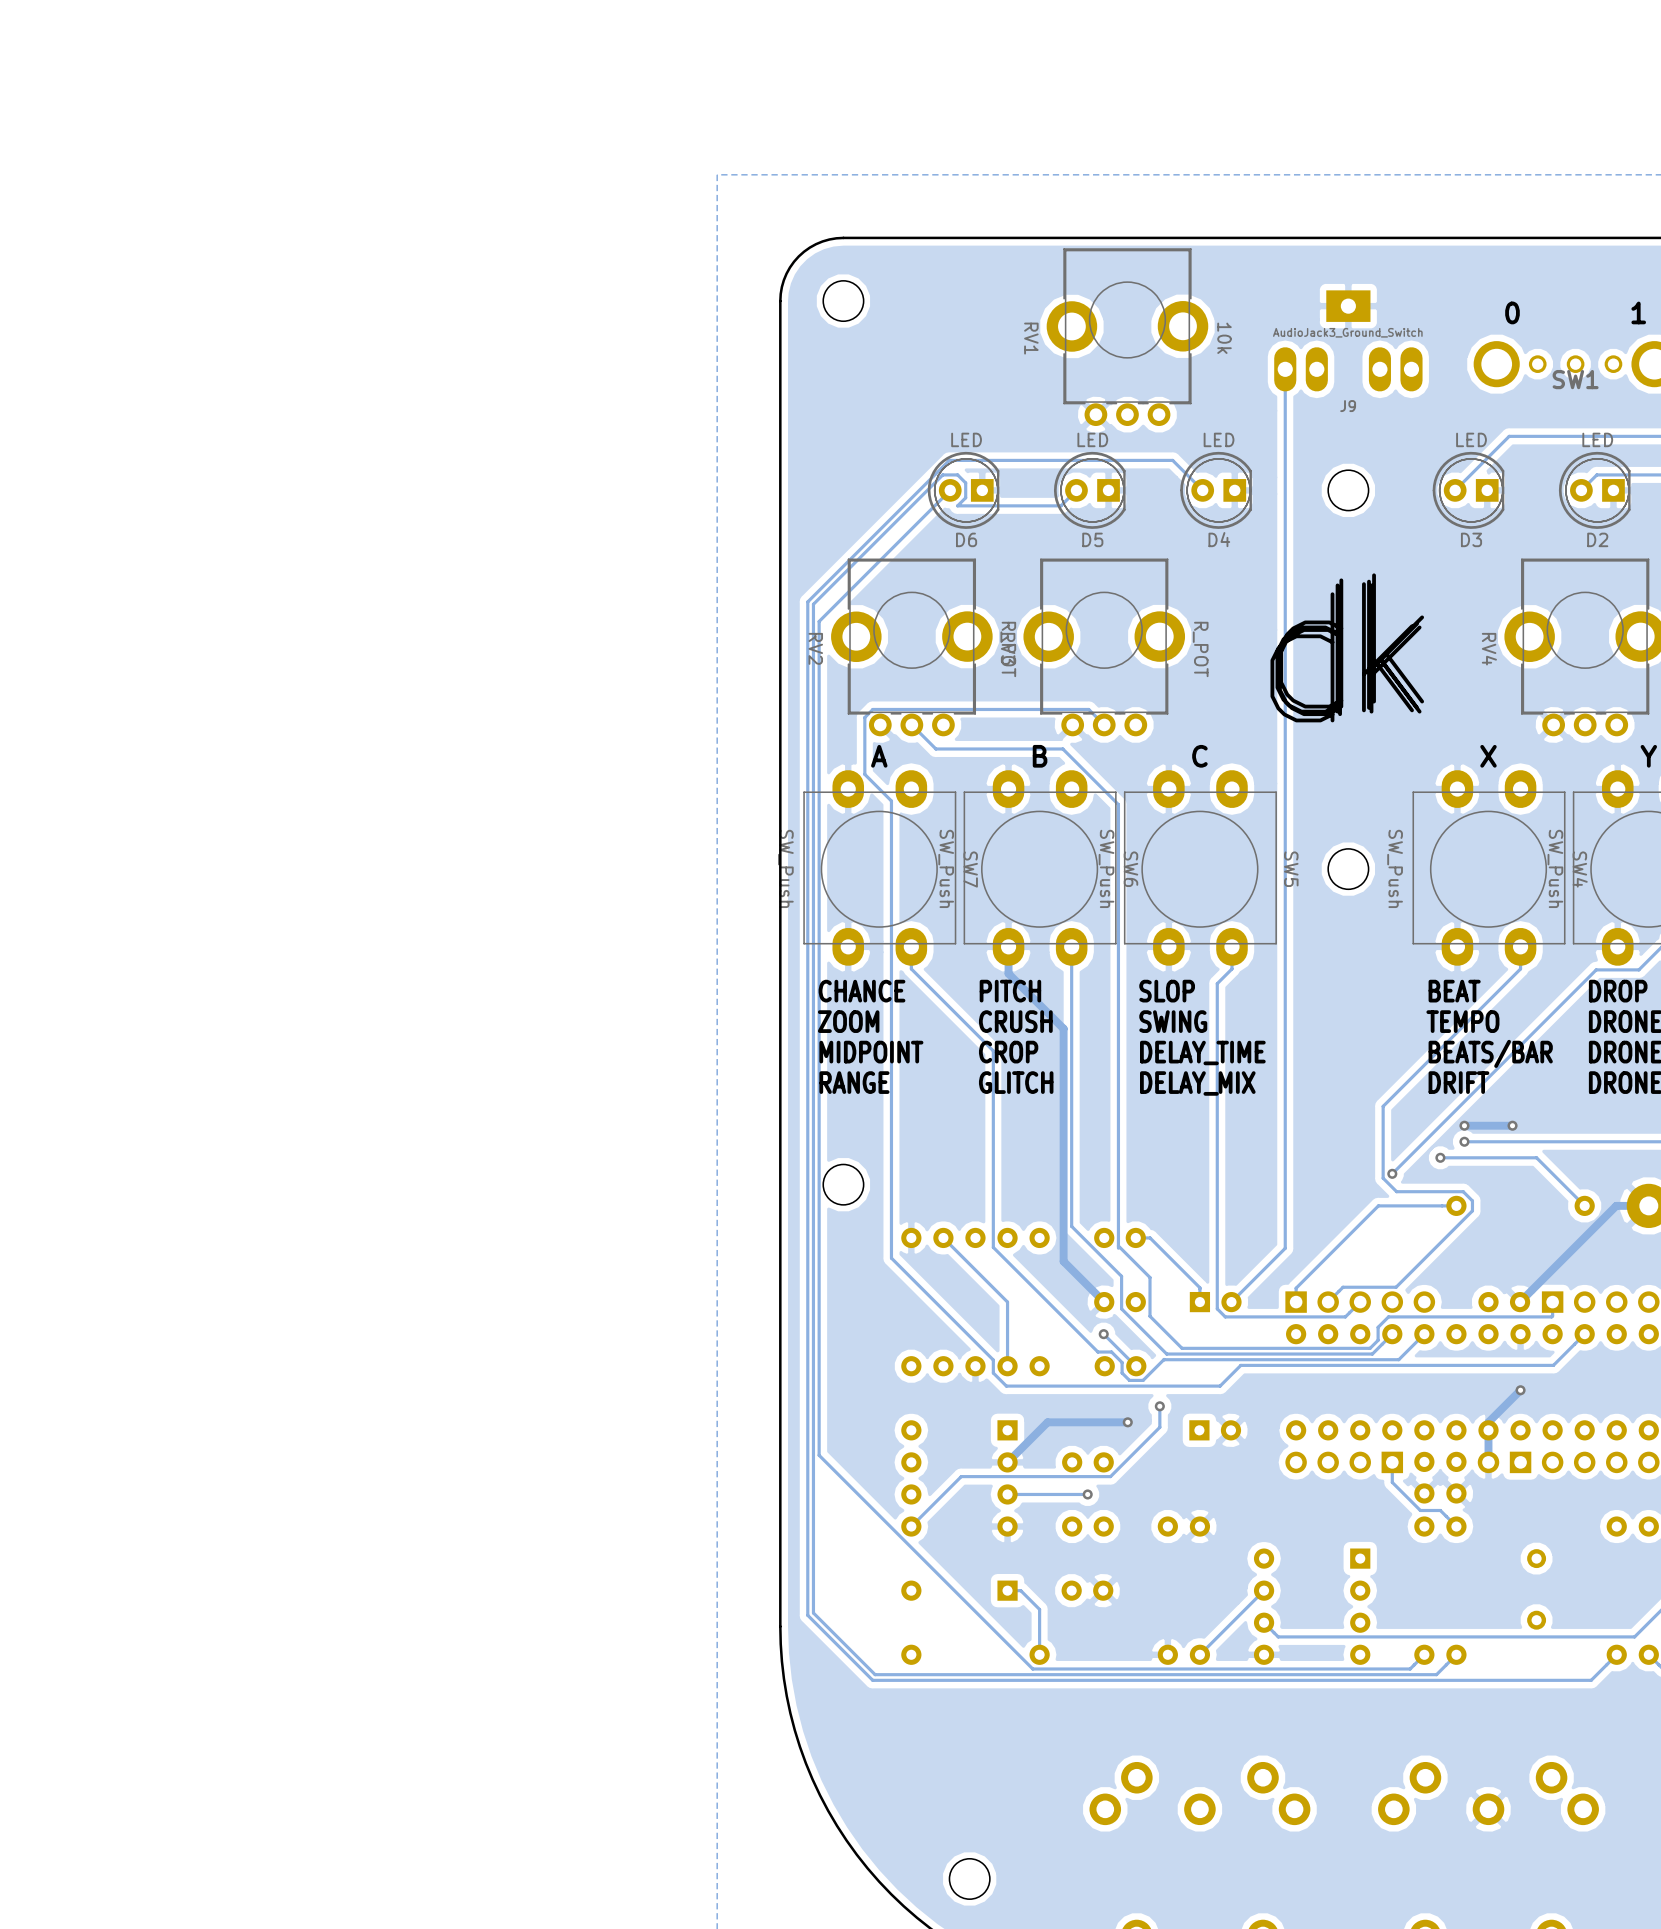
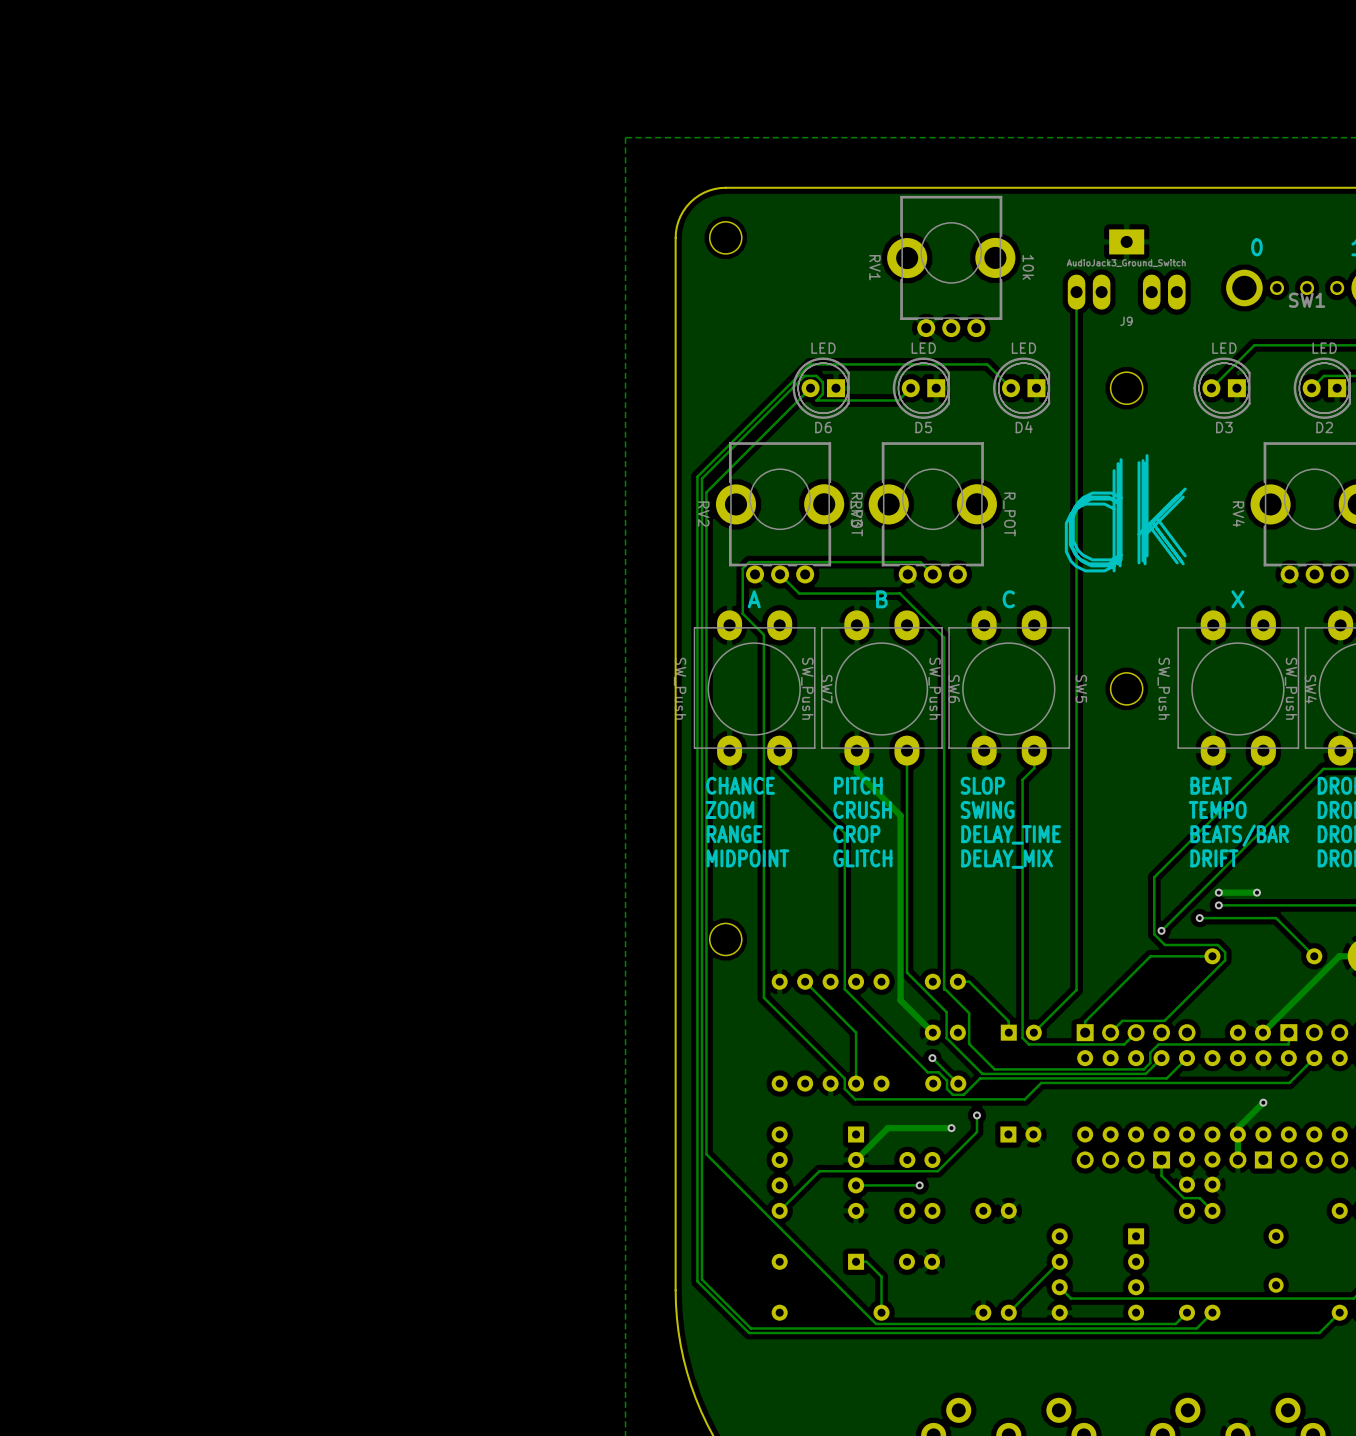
text: MIDPOINT (871, 1052) -> RANGE (734, 834)
text: RANGE (854, 1082) -> MIDPOINT (747, 858)

